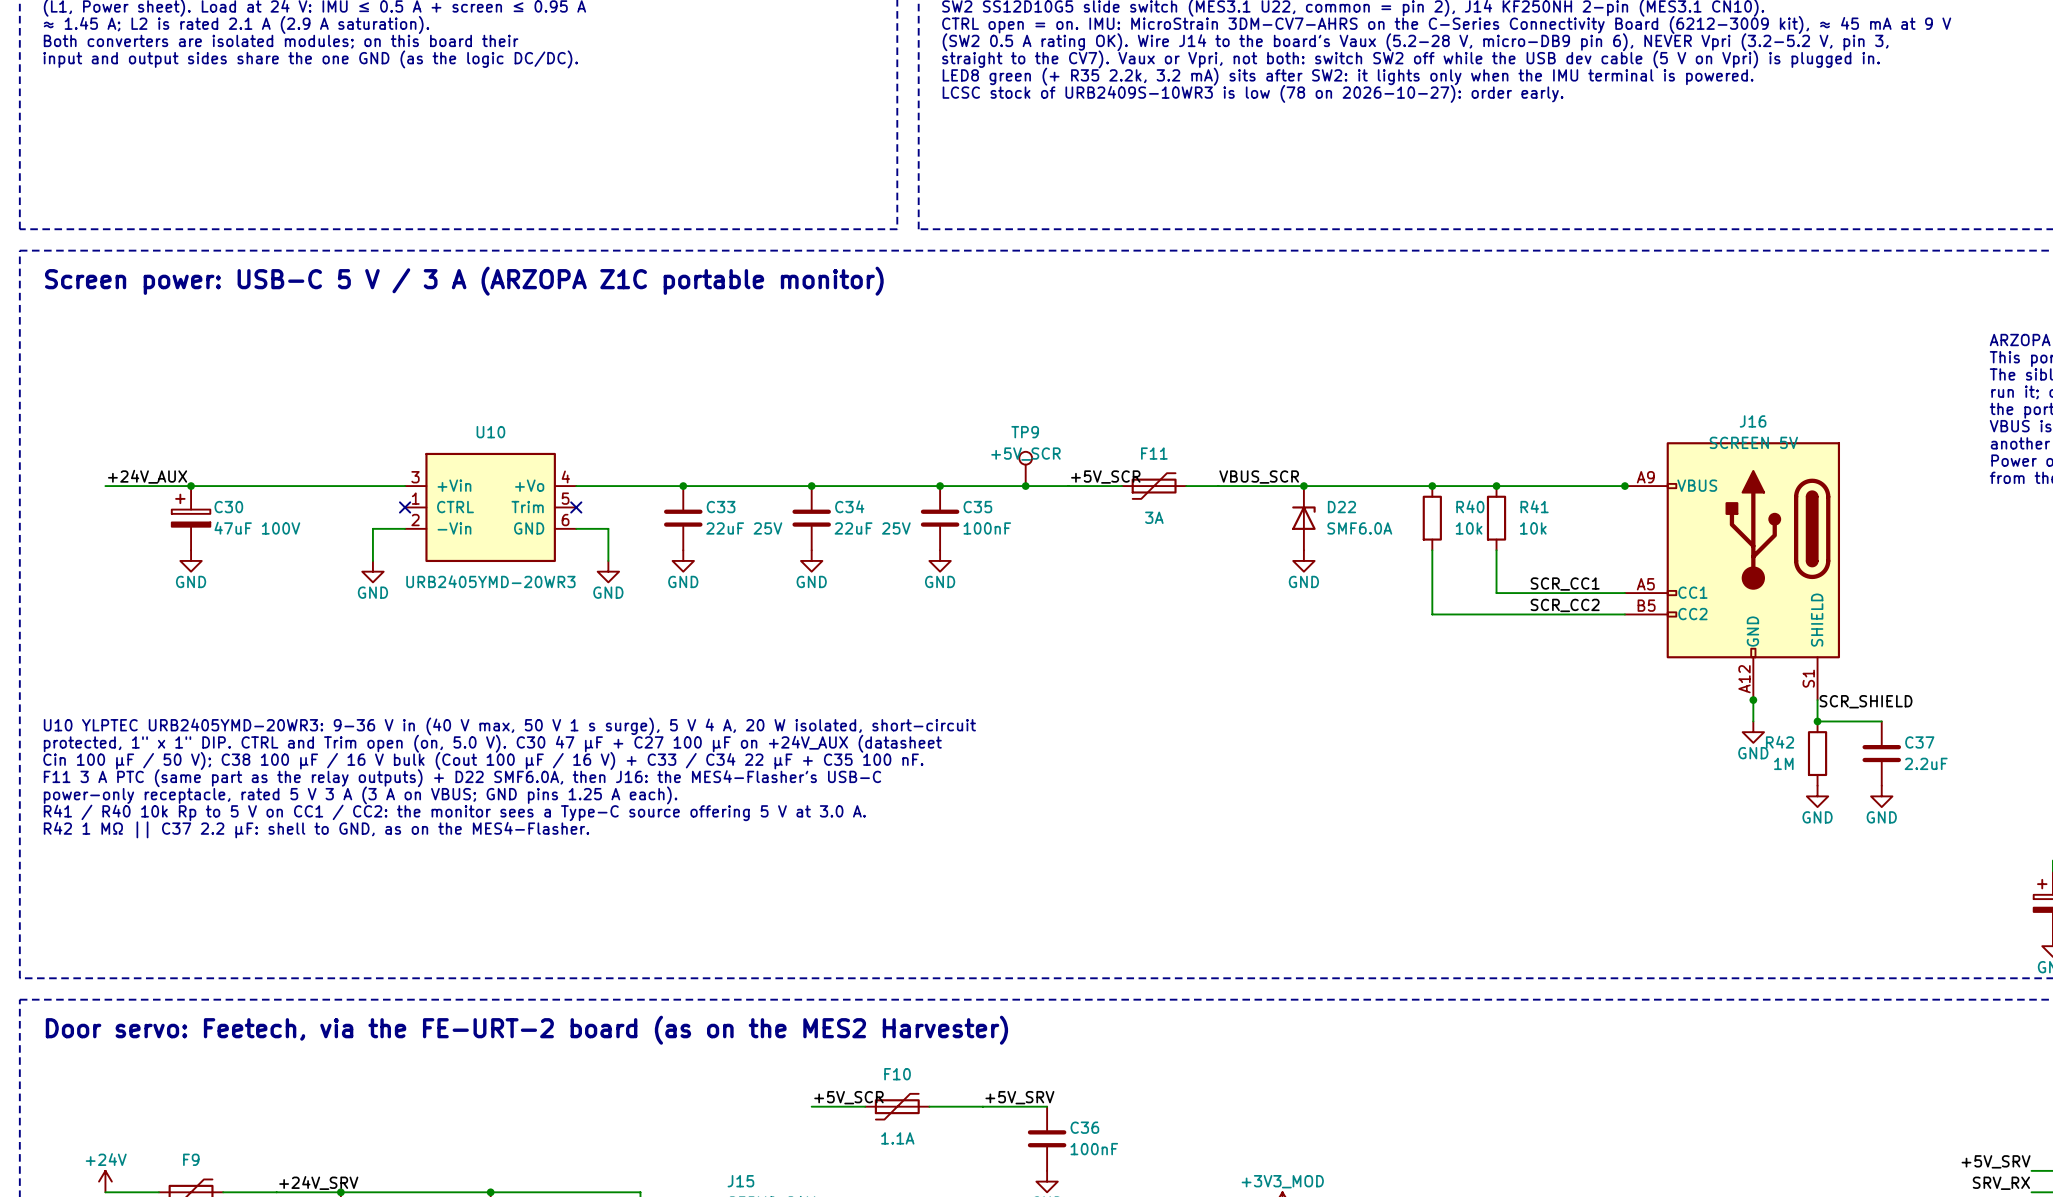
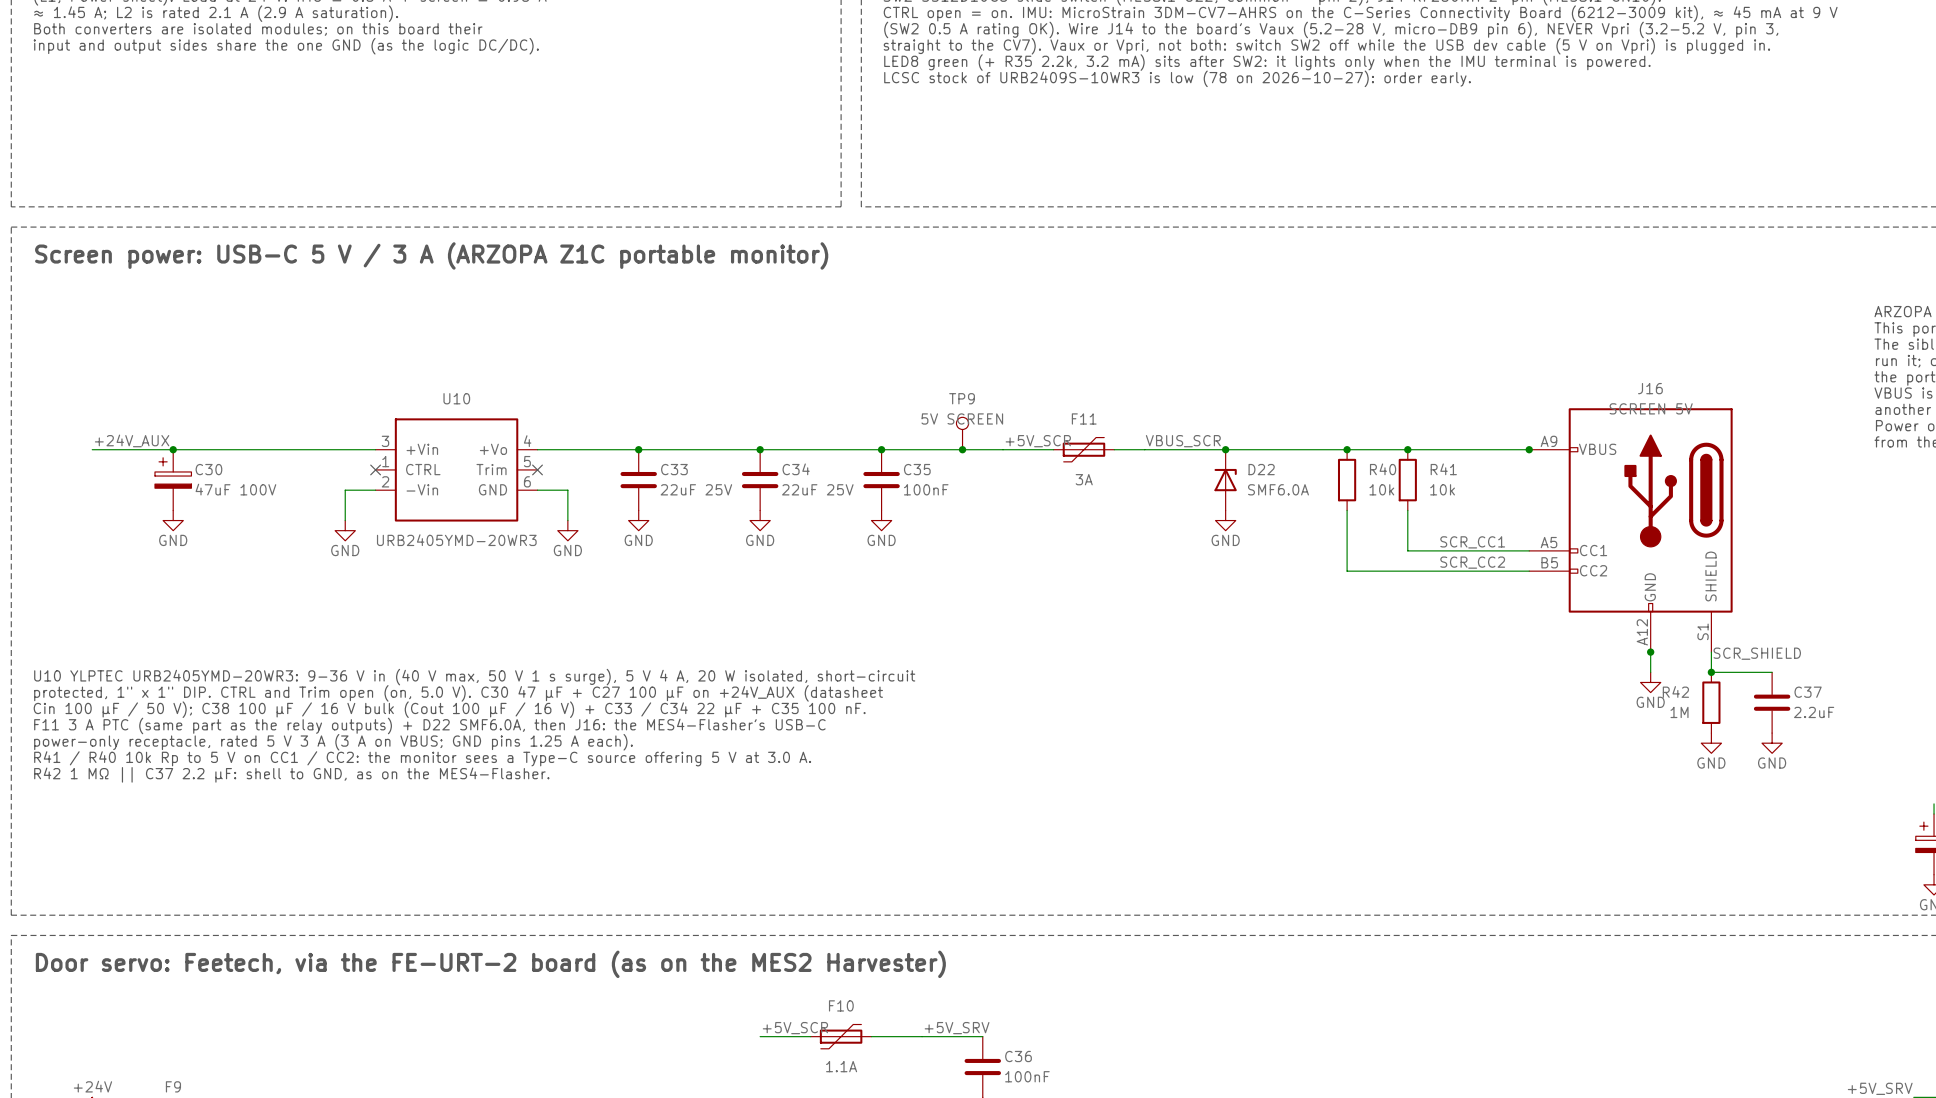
TP9 value: +5V_SCR (1025, 454) -> 5V SCREEN (962, 418)

